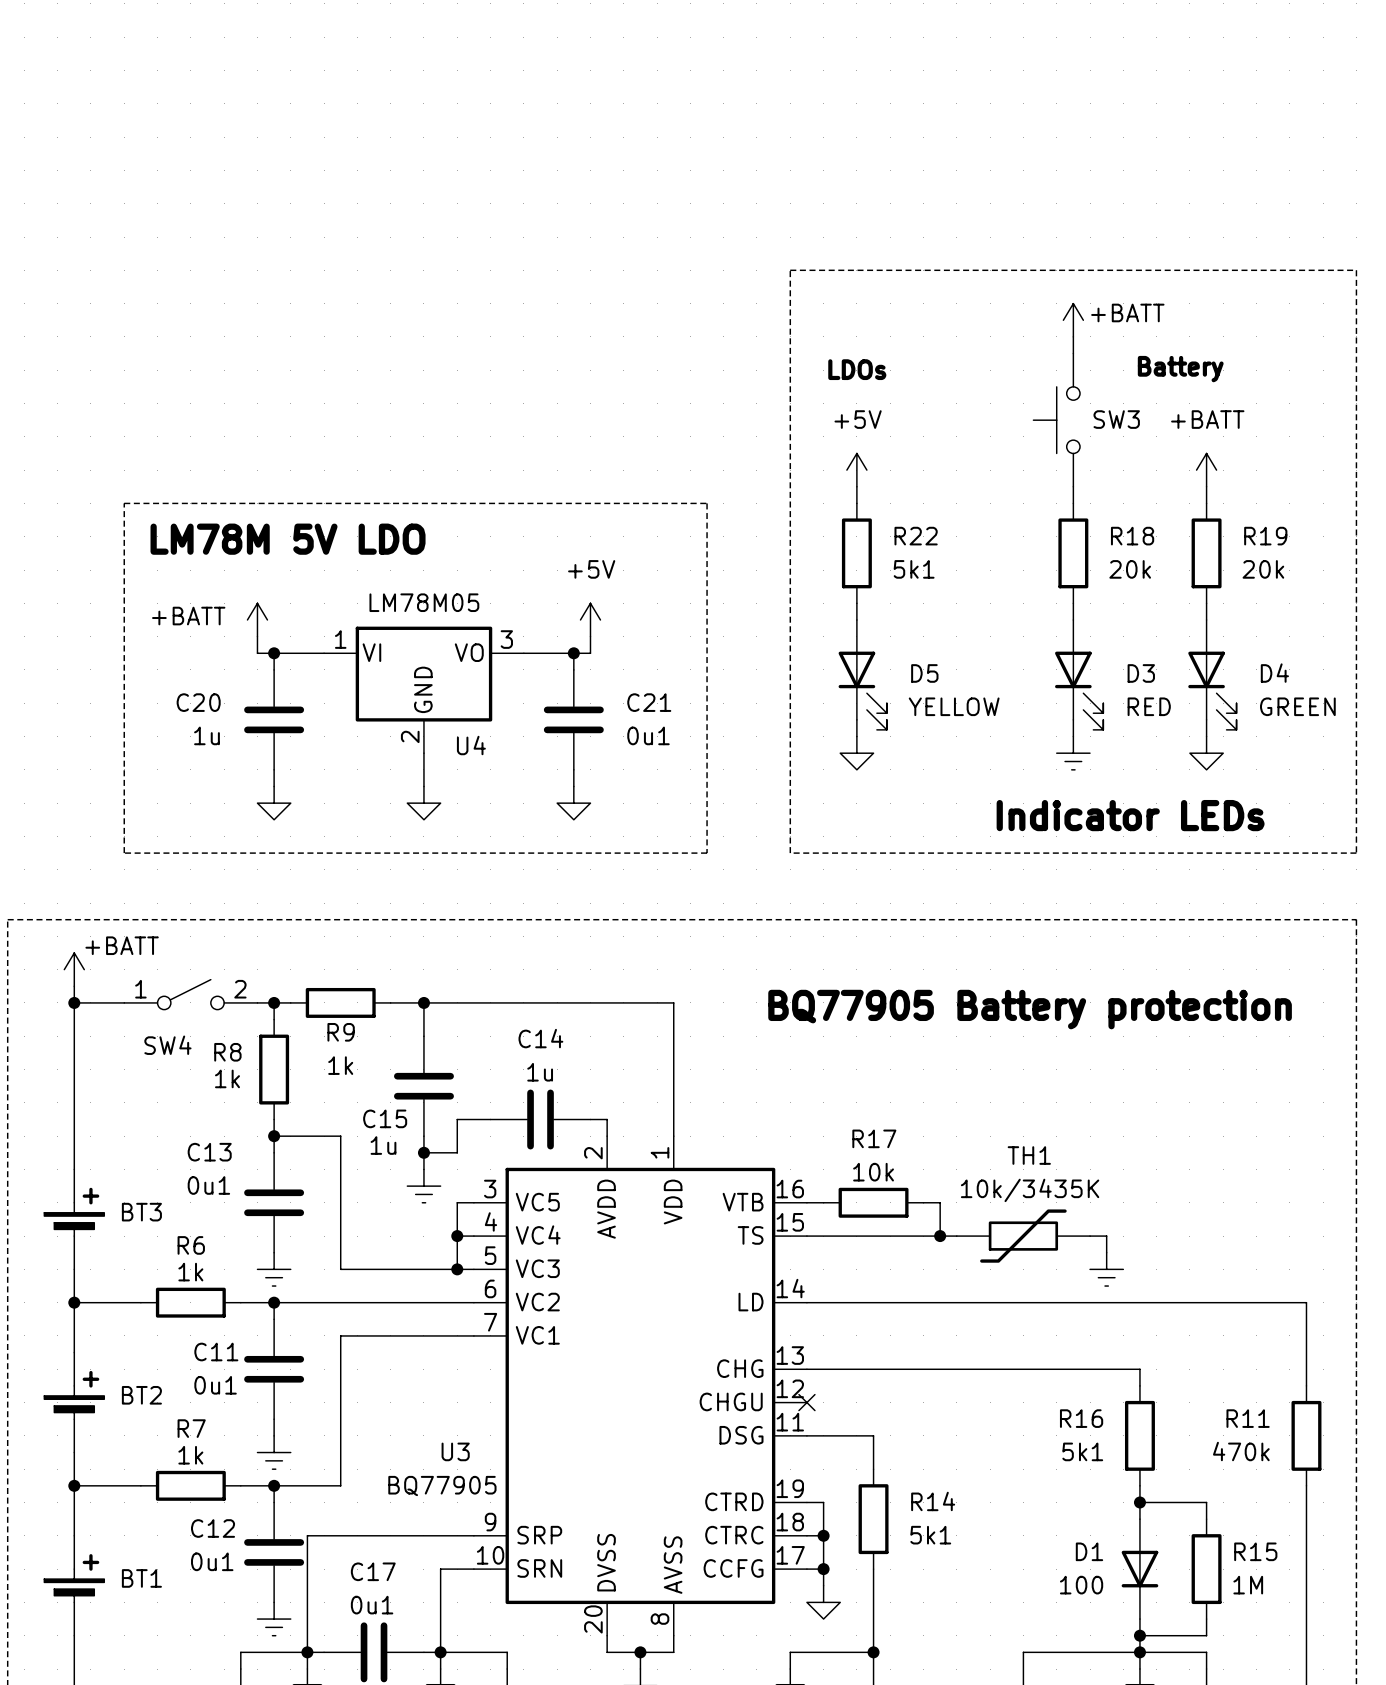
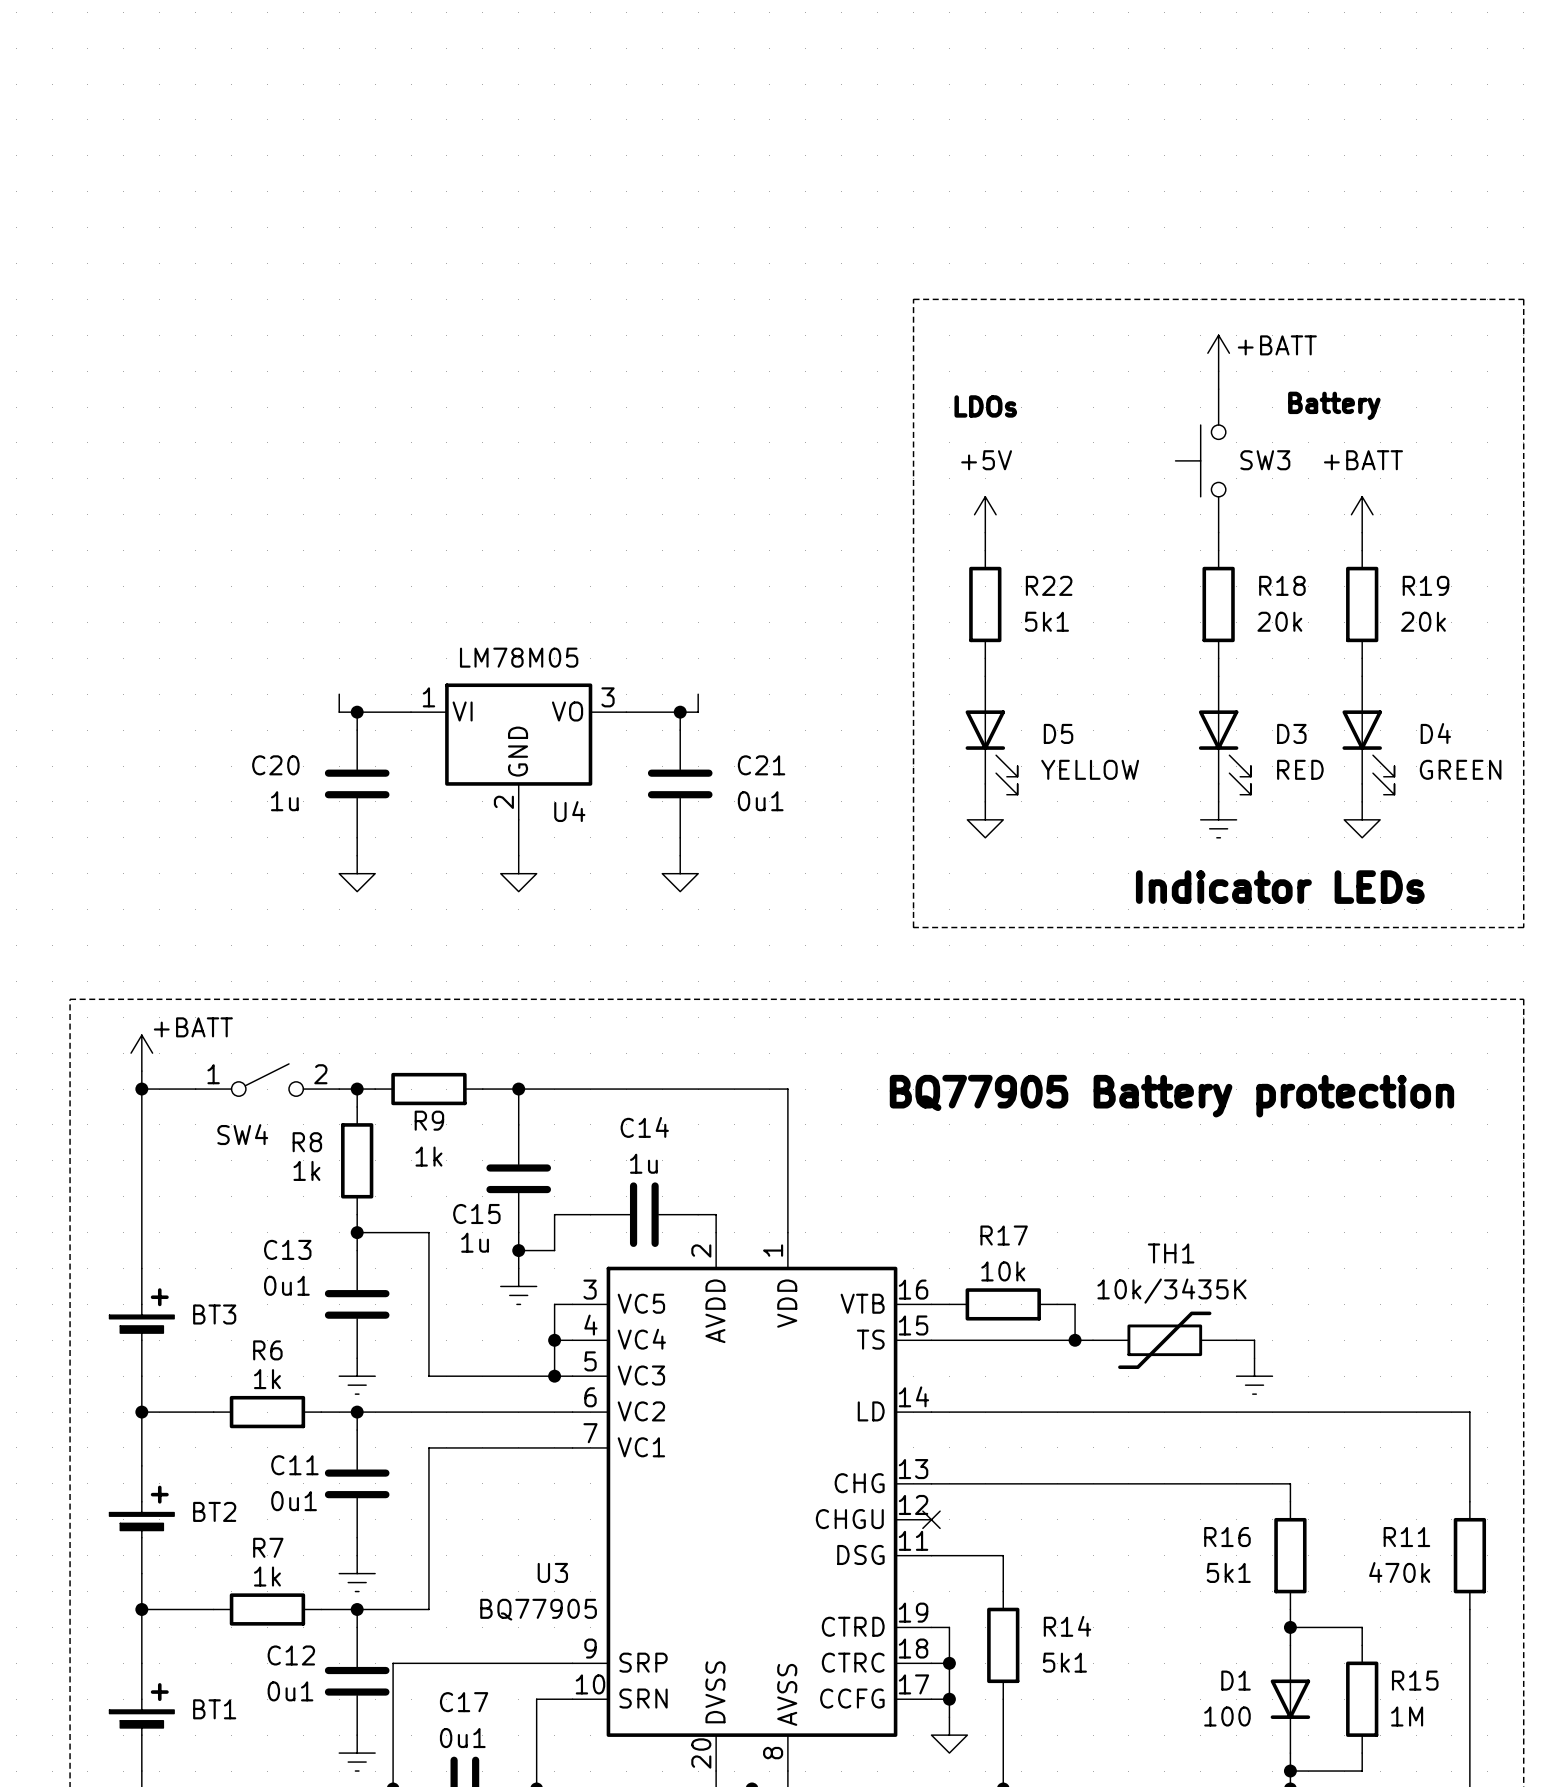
line: (124, 503) (707, 503) (707, 853) (124, 853) (124, 503) -> none
text: LM78M 5V LDO (288, 539) -> none
power symbol: +BATT (257, 619) -> none
power symbol: +5V (590, 619) -> none

